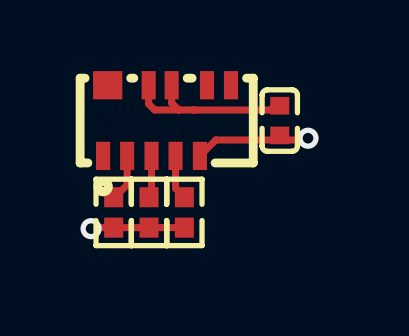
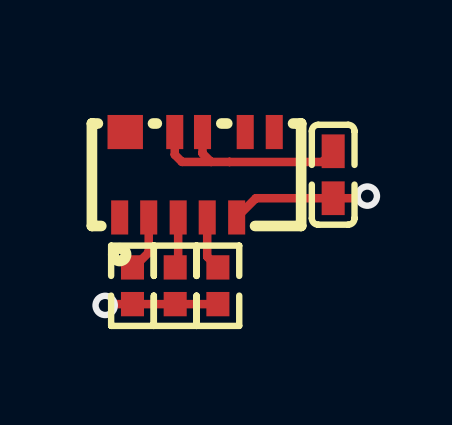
part footprint: [259, 87, 301, 154] -> [308, 121, 358, 228]

